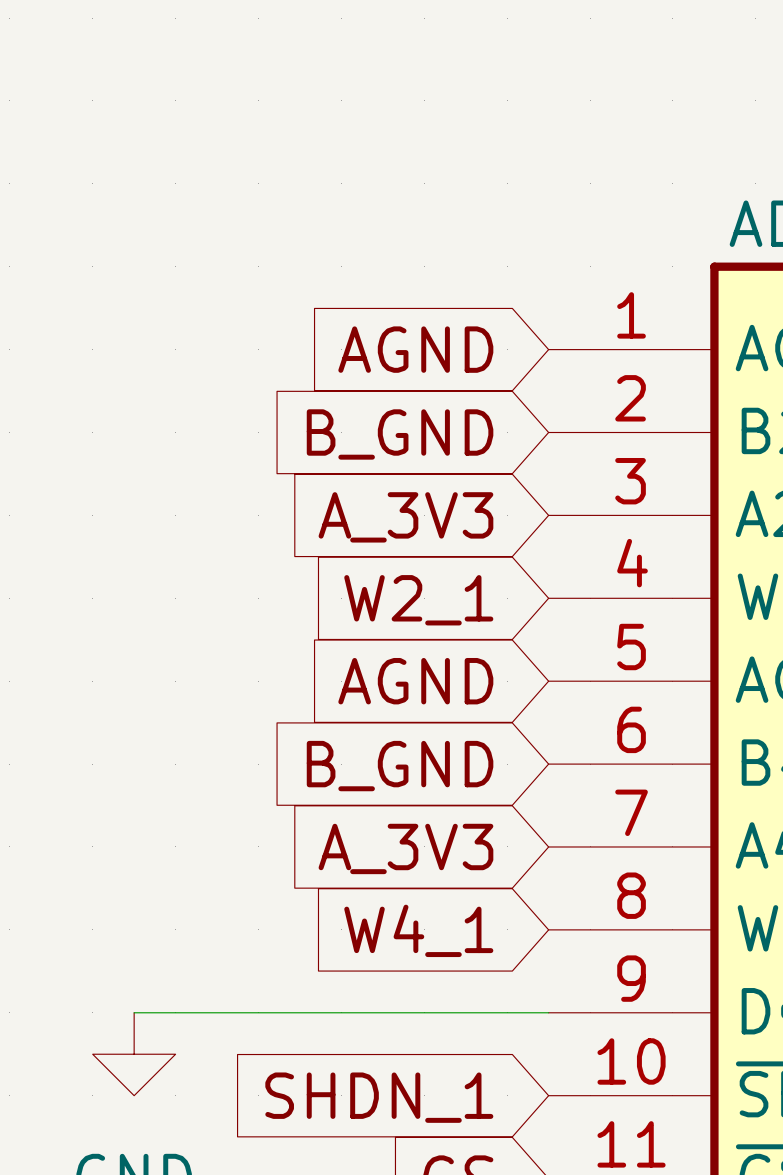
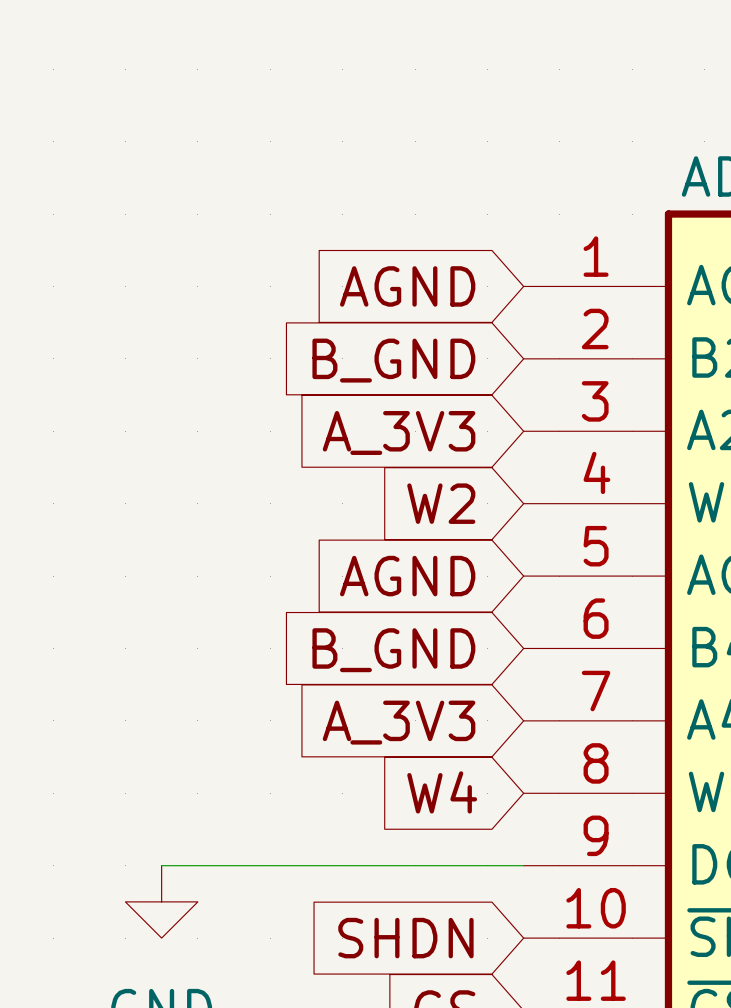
global label: W2_1 (418, 600) -> W2 (441, 503)
global label: W4_1 (418, 930) -> W4 (442, 792)
global label: SHDN_1 (379, 1097) -> SHDN (405, 938)

